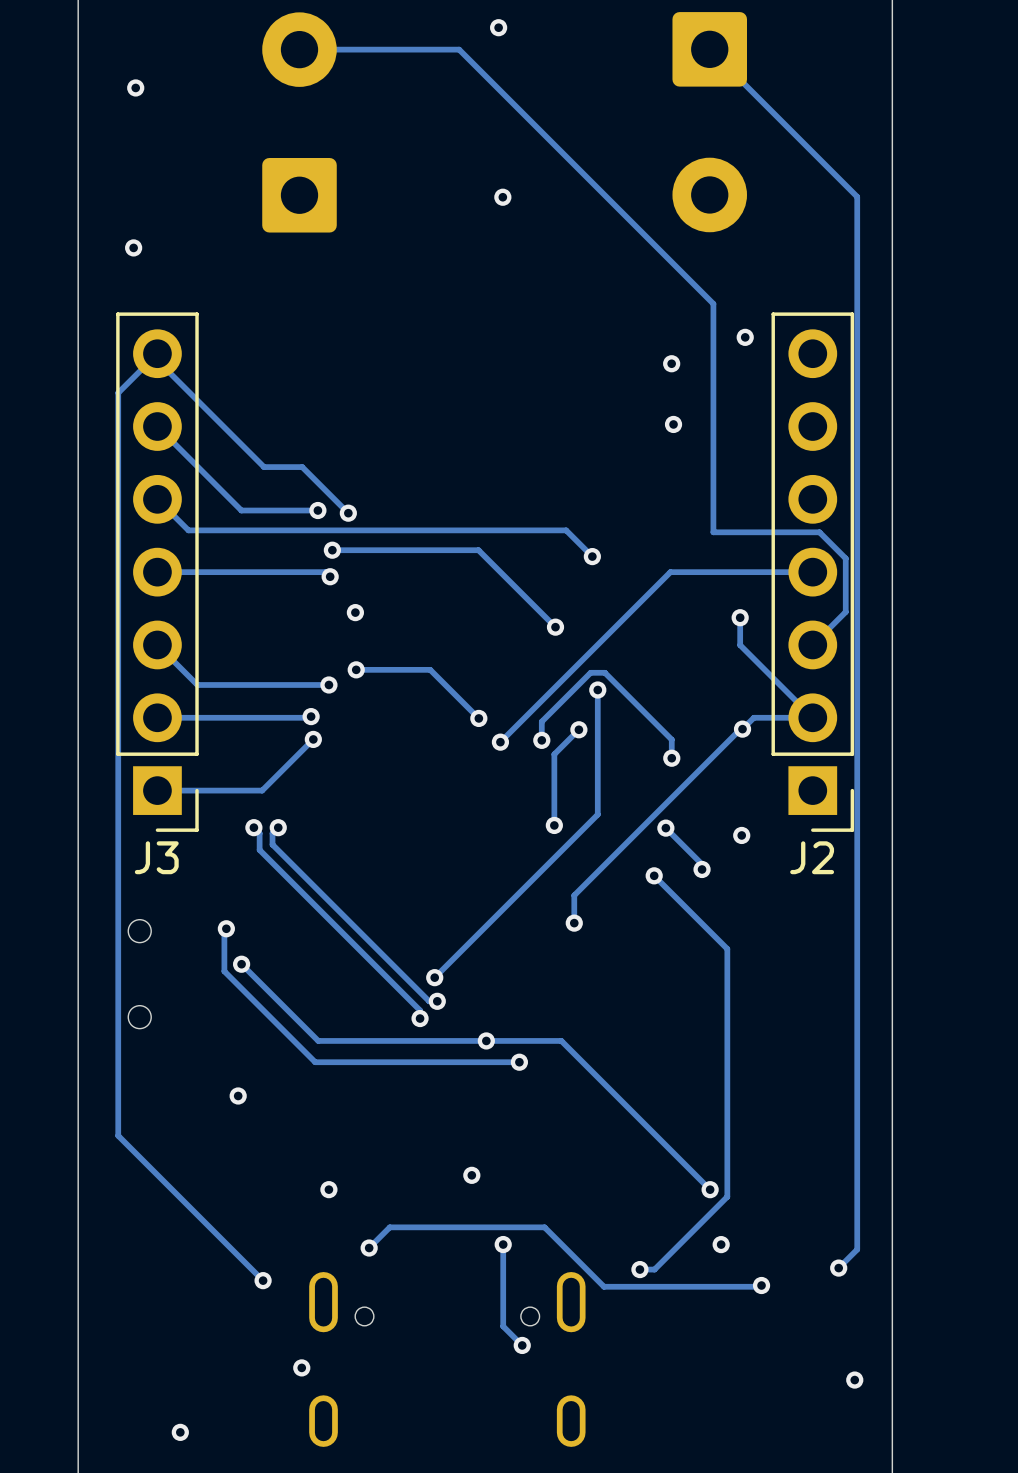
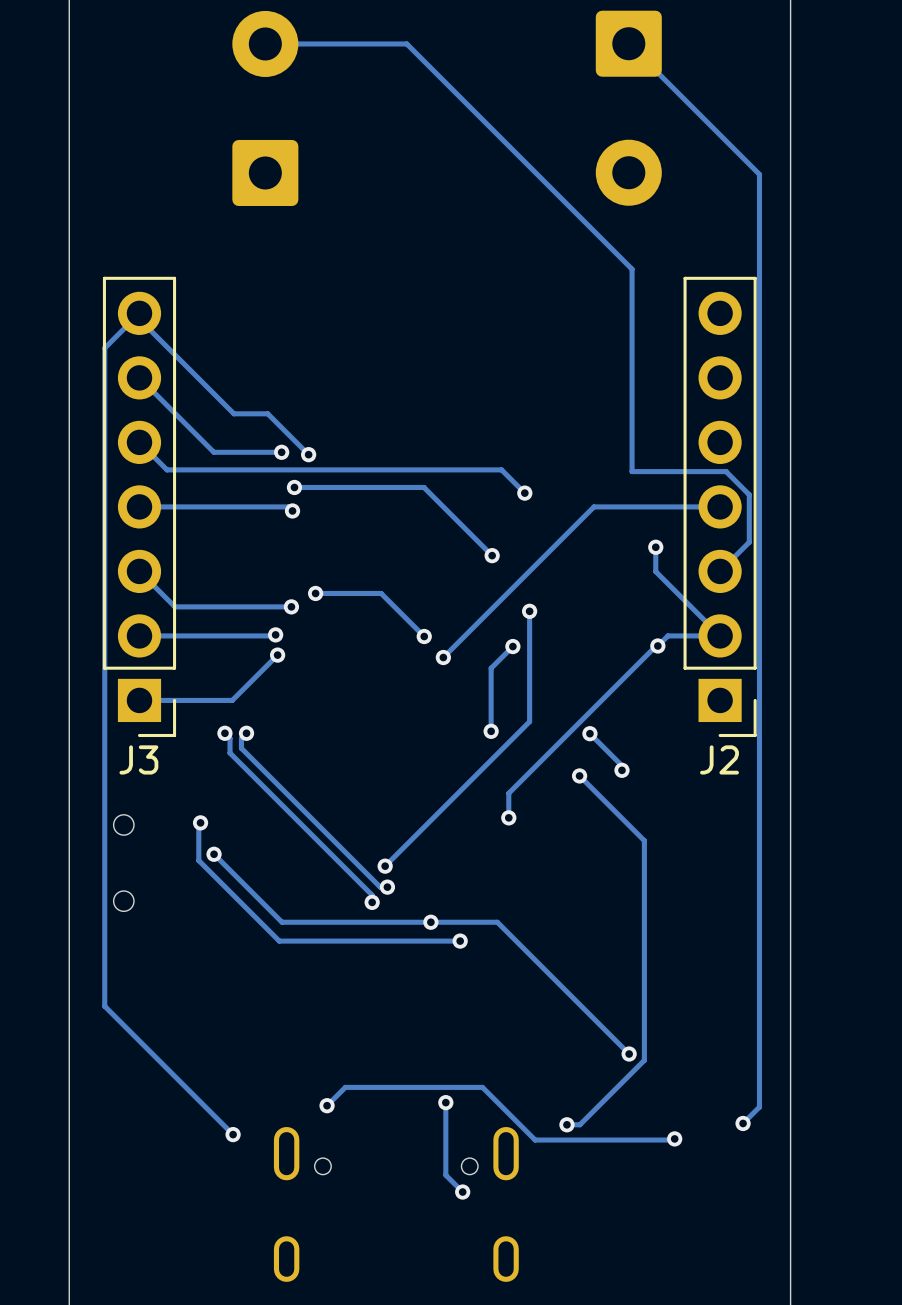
via: (498, 27) -> none
via: (135, 87) -> none
via: (502, 197) -> none
via: (133, 247) -> none
via: (745, 337) -> none
via: (671, 363) -> none
via: (673, 424) -> none
via: (355, 612) -> none
track: (541, 740) (541, 721) (590, 672) (604, 672) (671, 739) (671, 758) -> none
via: (541, 740) -> none
via: (671, 758) -> none
via: (741, 835) -> none
via: (238, 1095) -> none
via: (471, 1175) -> none
via: (328, 1189) -> none
via: (721, 1244) -> none
via: (301, 1367) -> none
via: (854, 1380) -> none
via: (180, 1432) -> none

